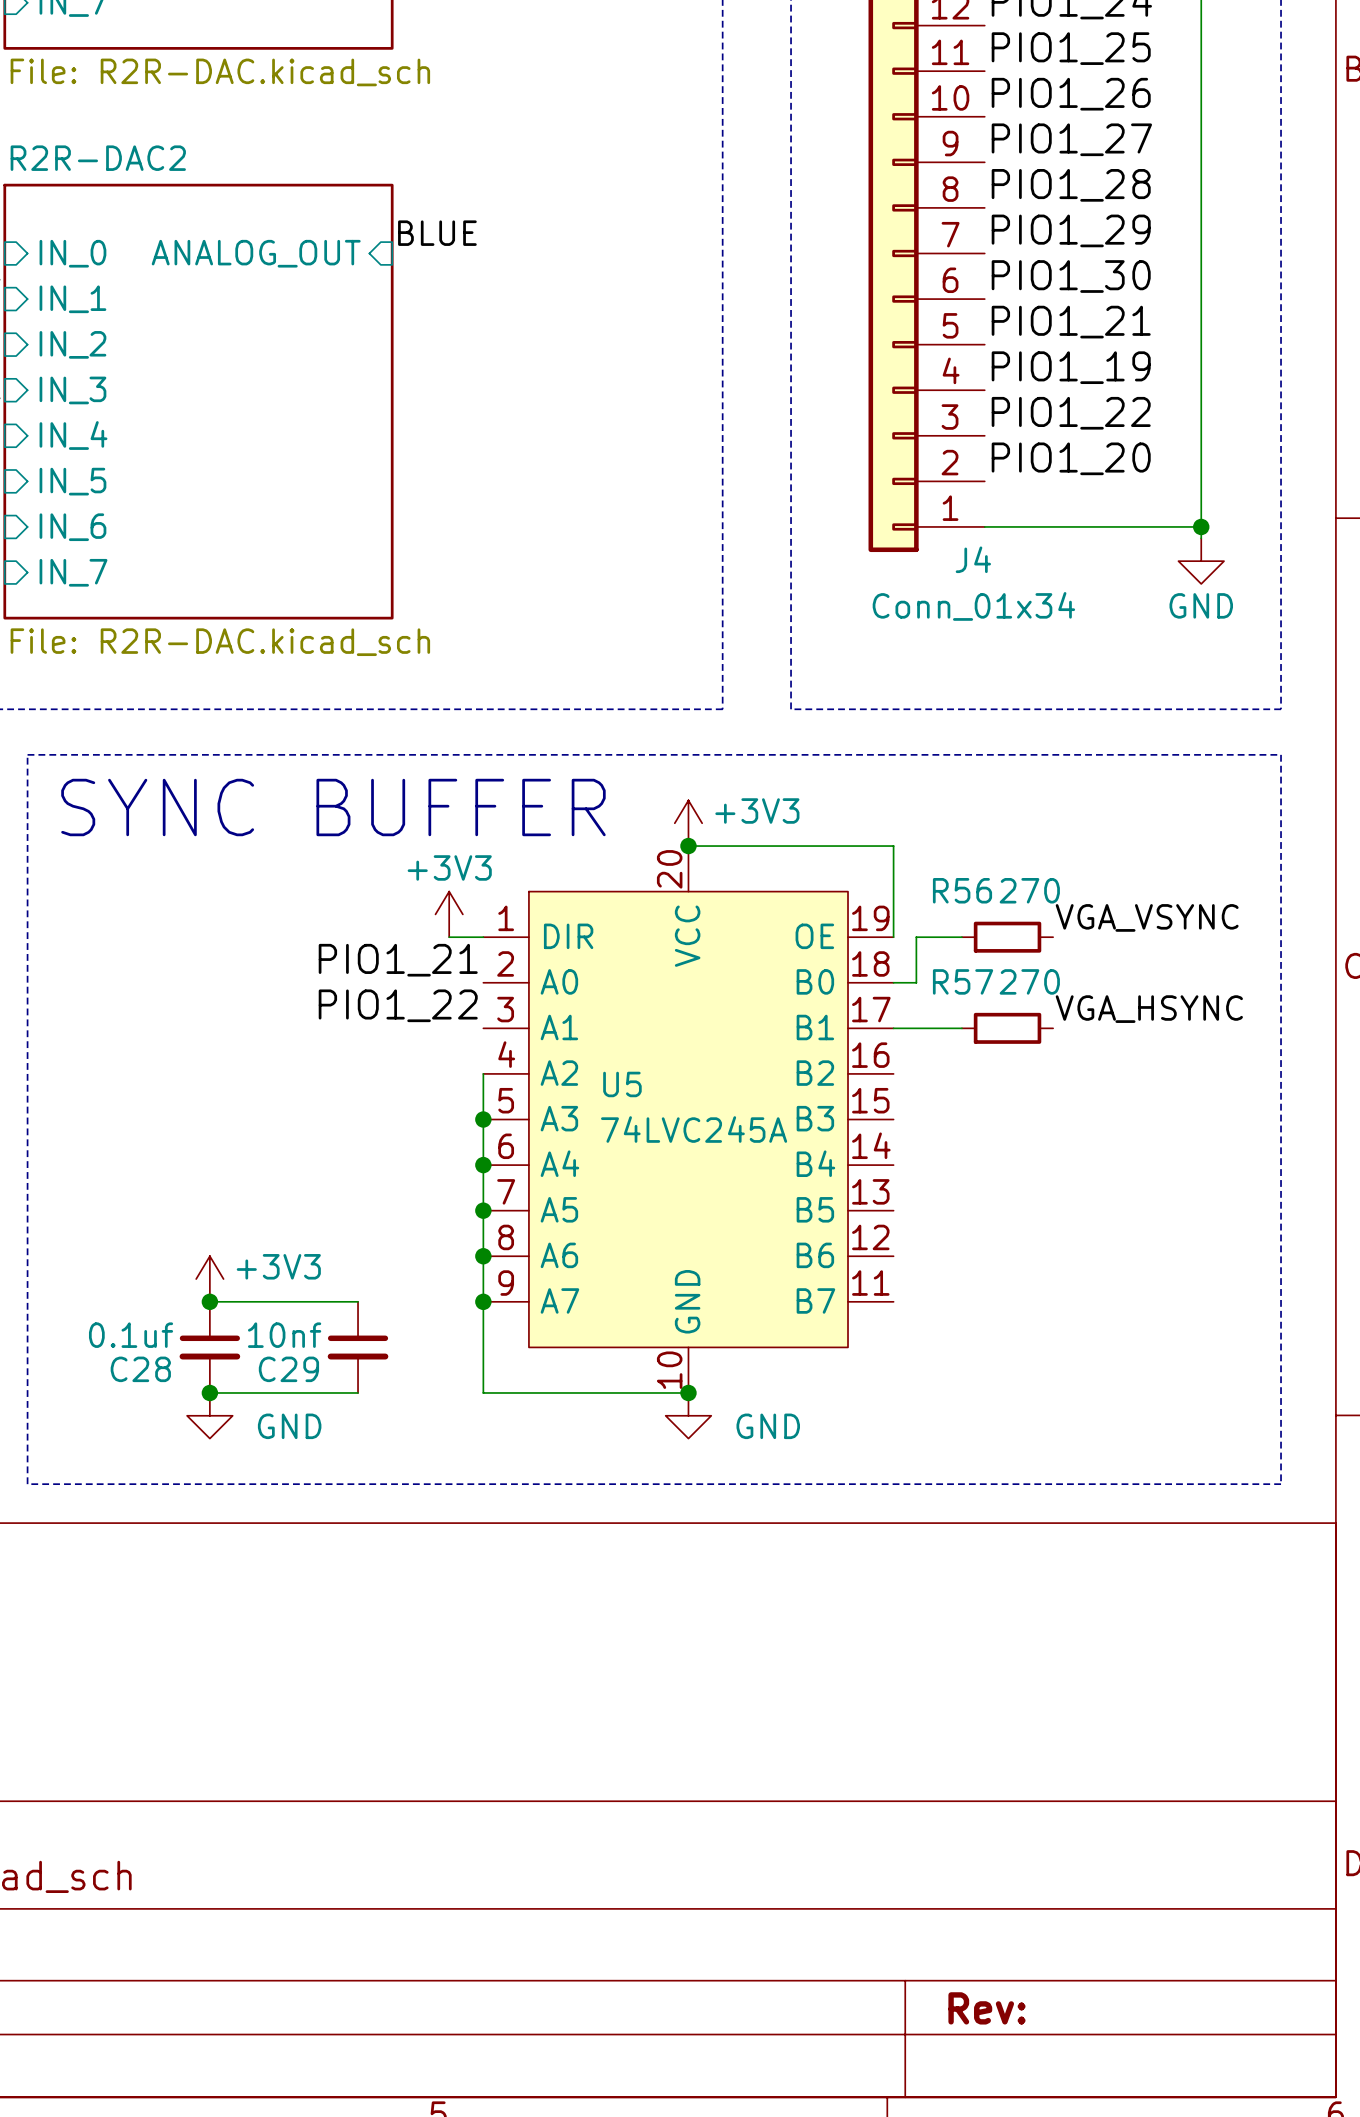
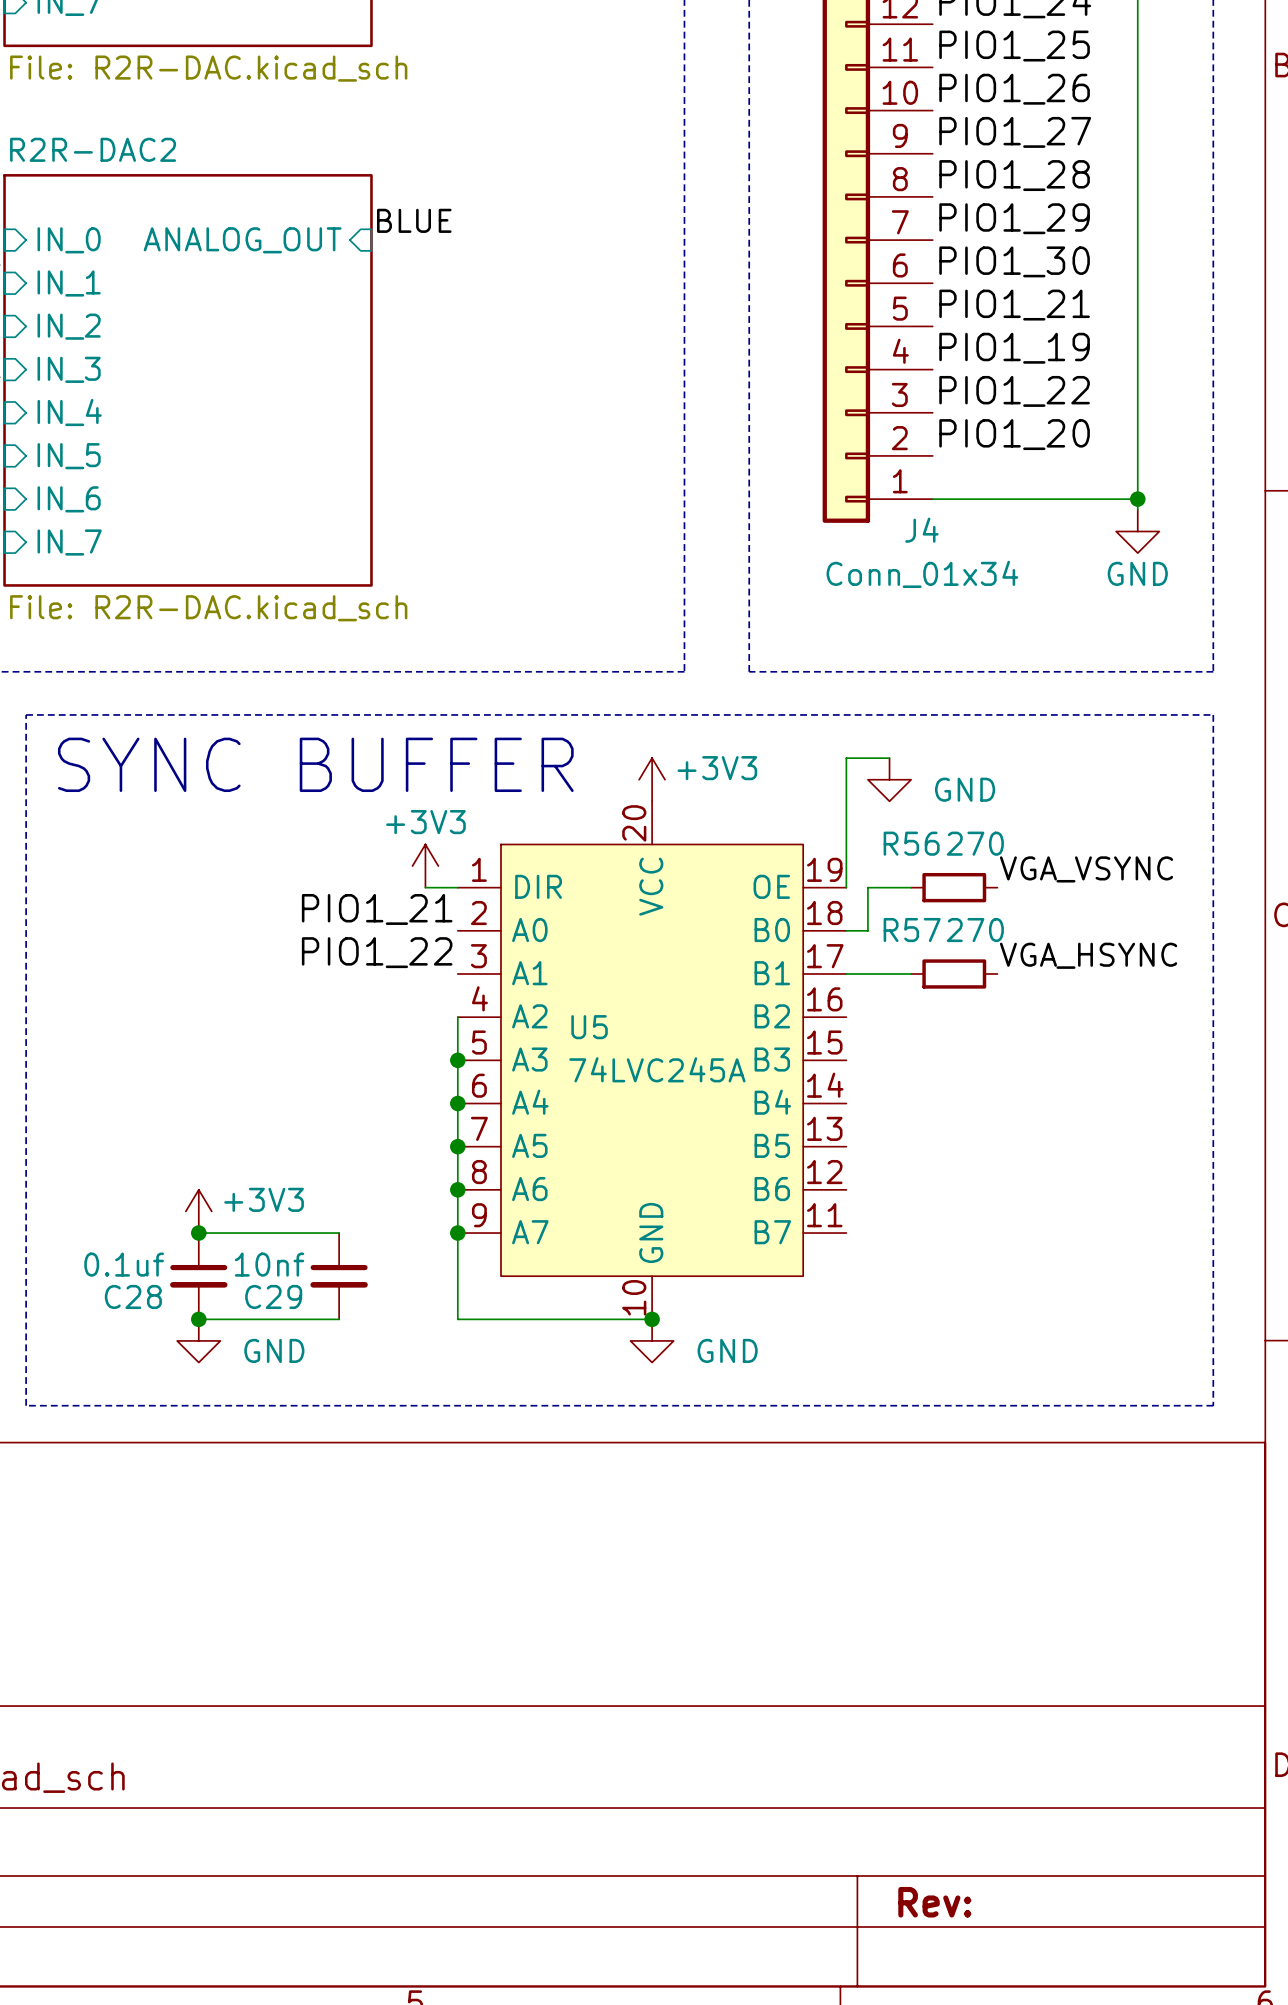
power symbol: none -> GND (889, 779)
wire: (688, 846) (893, 846) -> (889, 758) (846, 758) (846, 801)
junction: (688, 846) -> none

